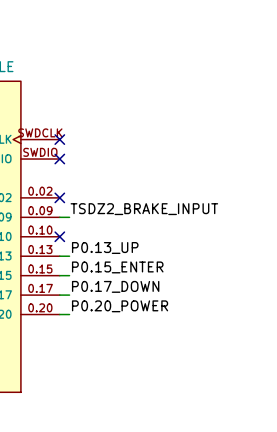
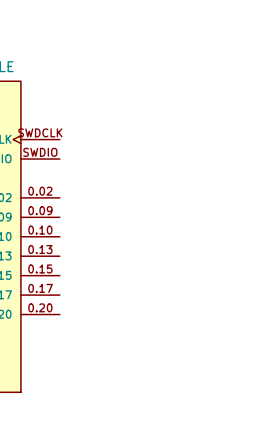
no-connect mark: (59, 139) -> none
no-connect mark: (59, 159) -> none
no-connect mark: (59, 197) -> none
label: TSDZ2_BRAKE_INPUT (144, 209) -> none
wire: (59, 217) (69, 217) -> none
no-connect mark: (59, 236) -> none
label: P0.13_UP (105, 248) -> none
wire: (59, 256) (69, 256) -> none
label: P0.15_ENTER (117, 267) -> none
wire: (59, 275) (69, 275) -> none
label: P0.17_DOWN (115, 286) -> none
wire: (59, 295) (69, 295) -> none
label: P0.20_POWER (120, 306) -> none
wire: (59, 314) (69, 314) -> none

